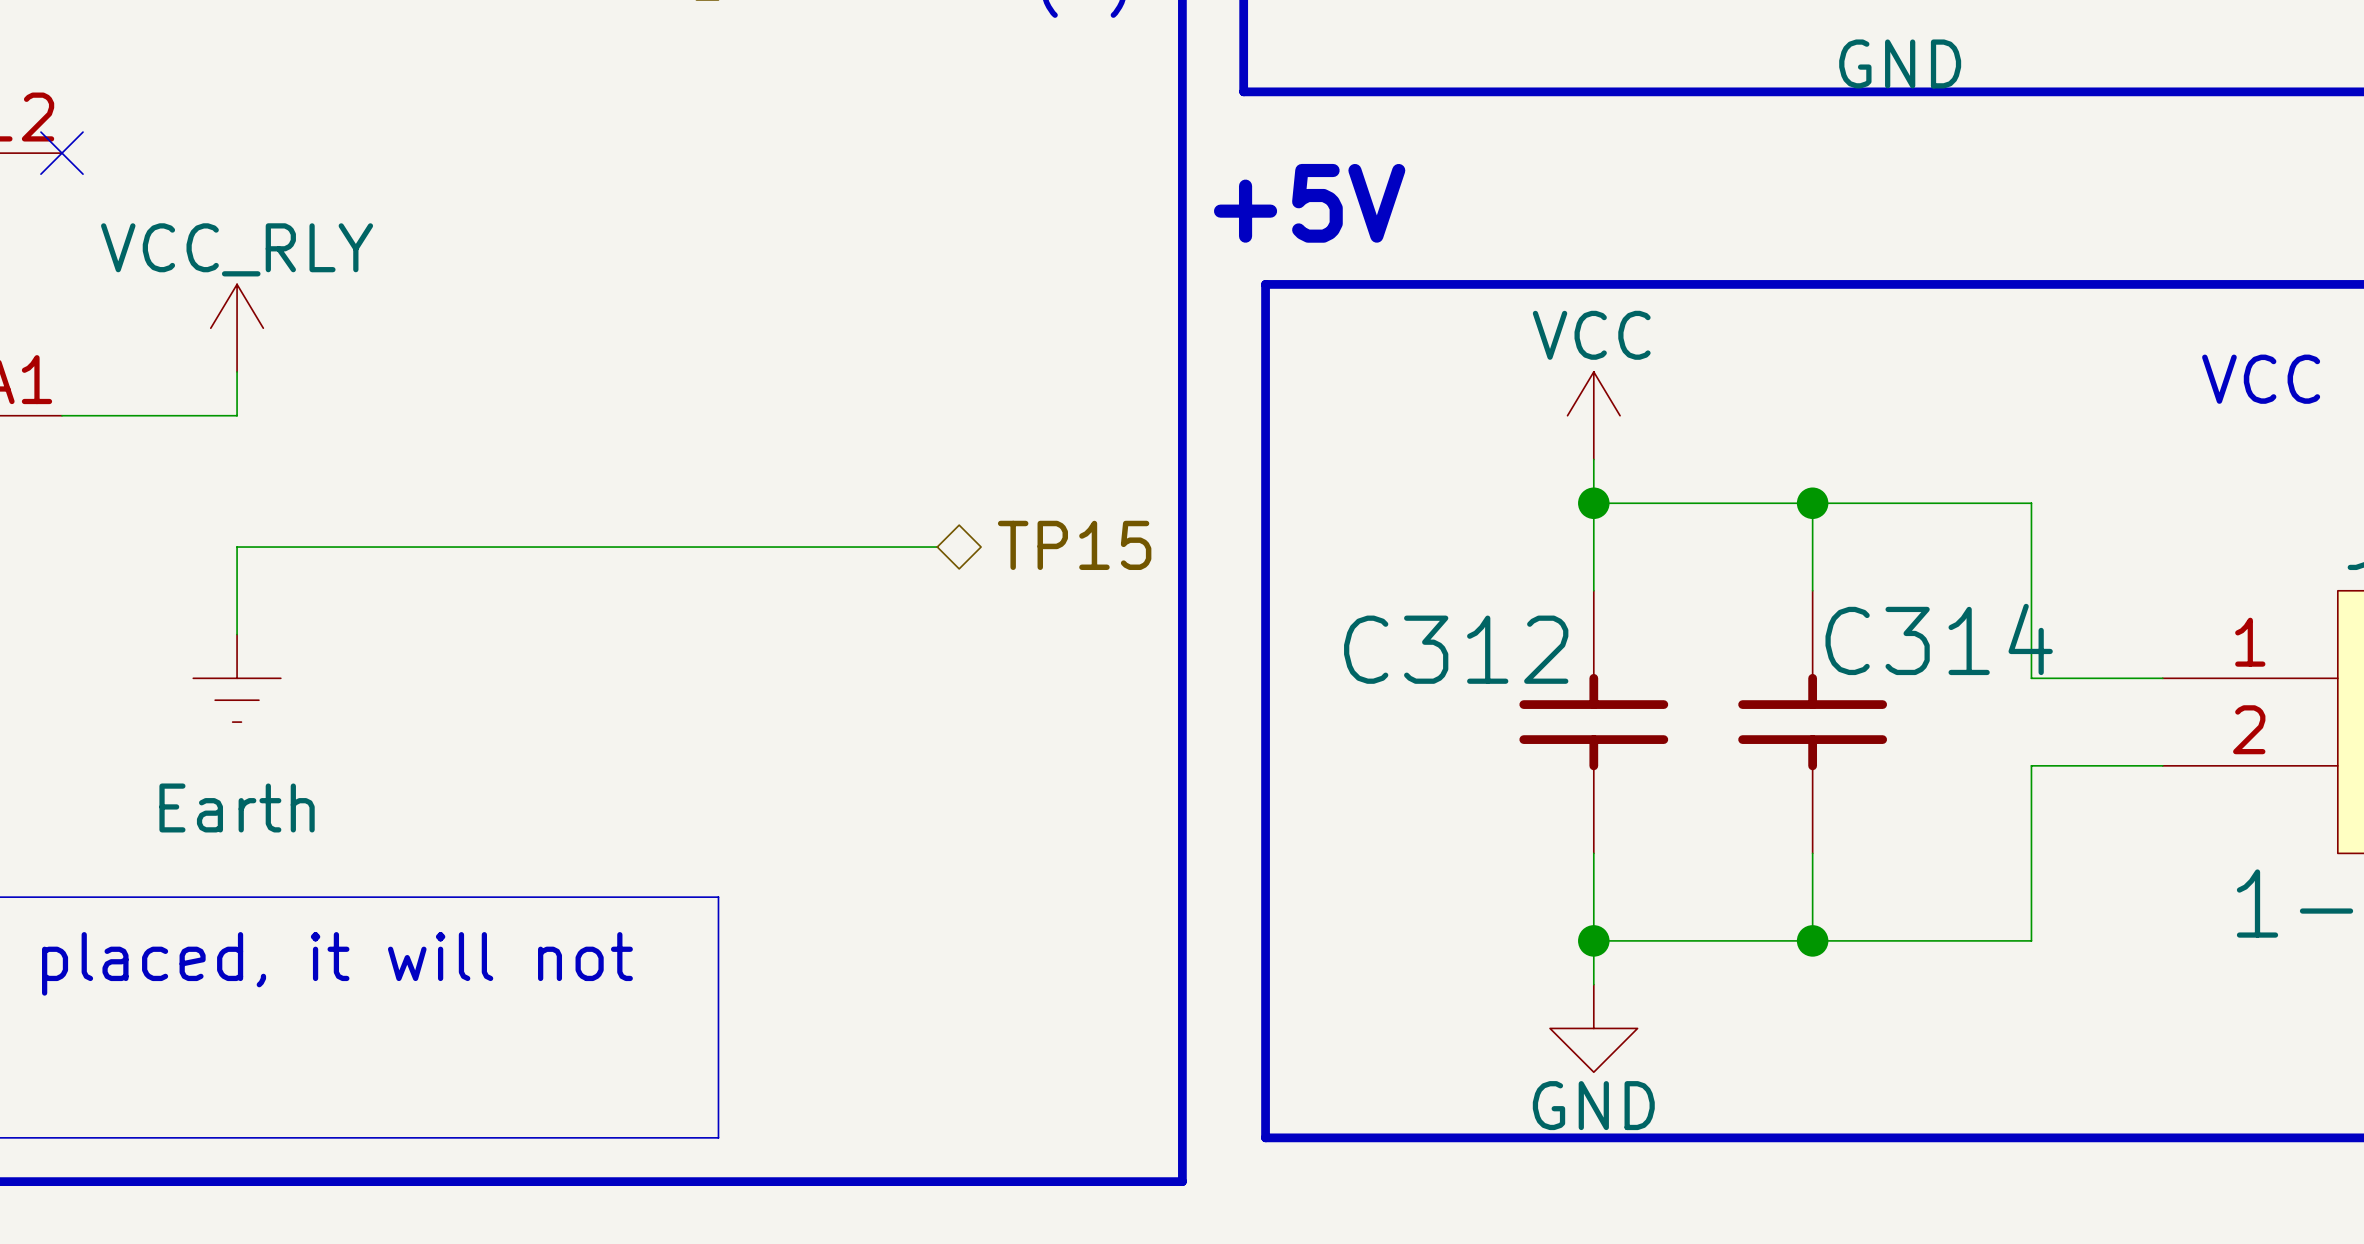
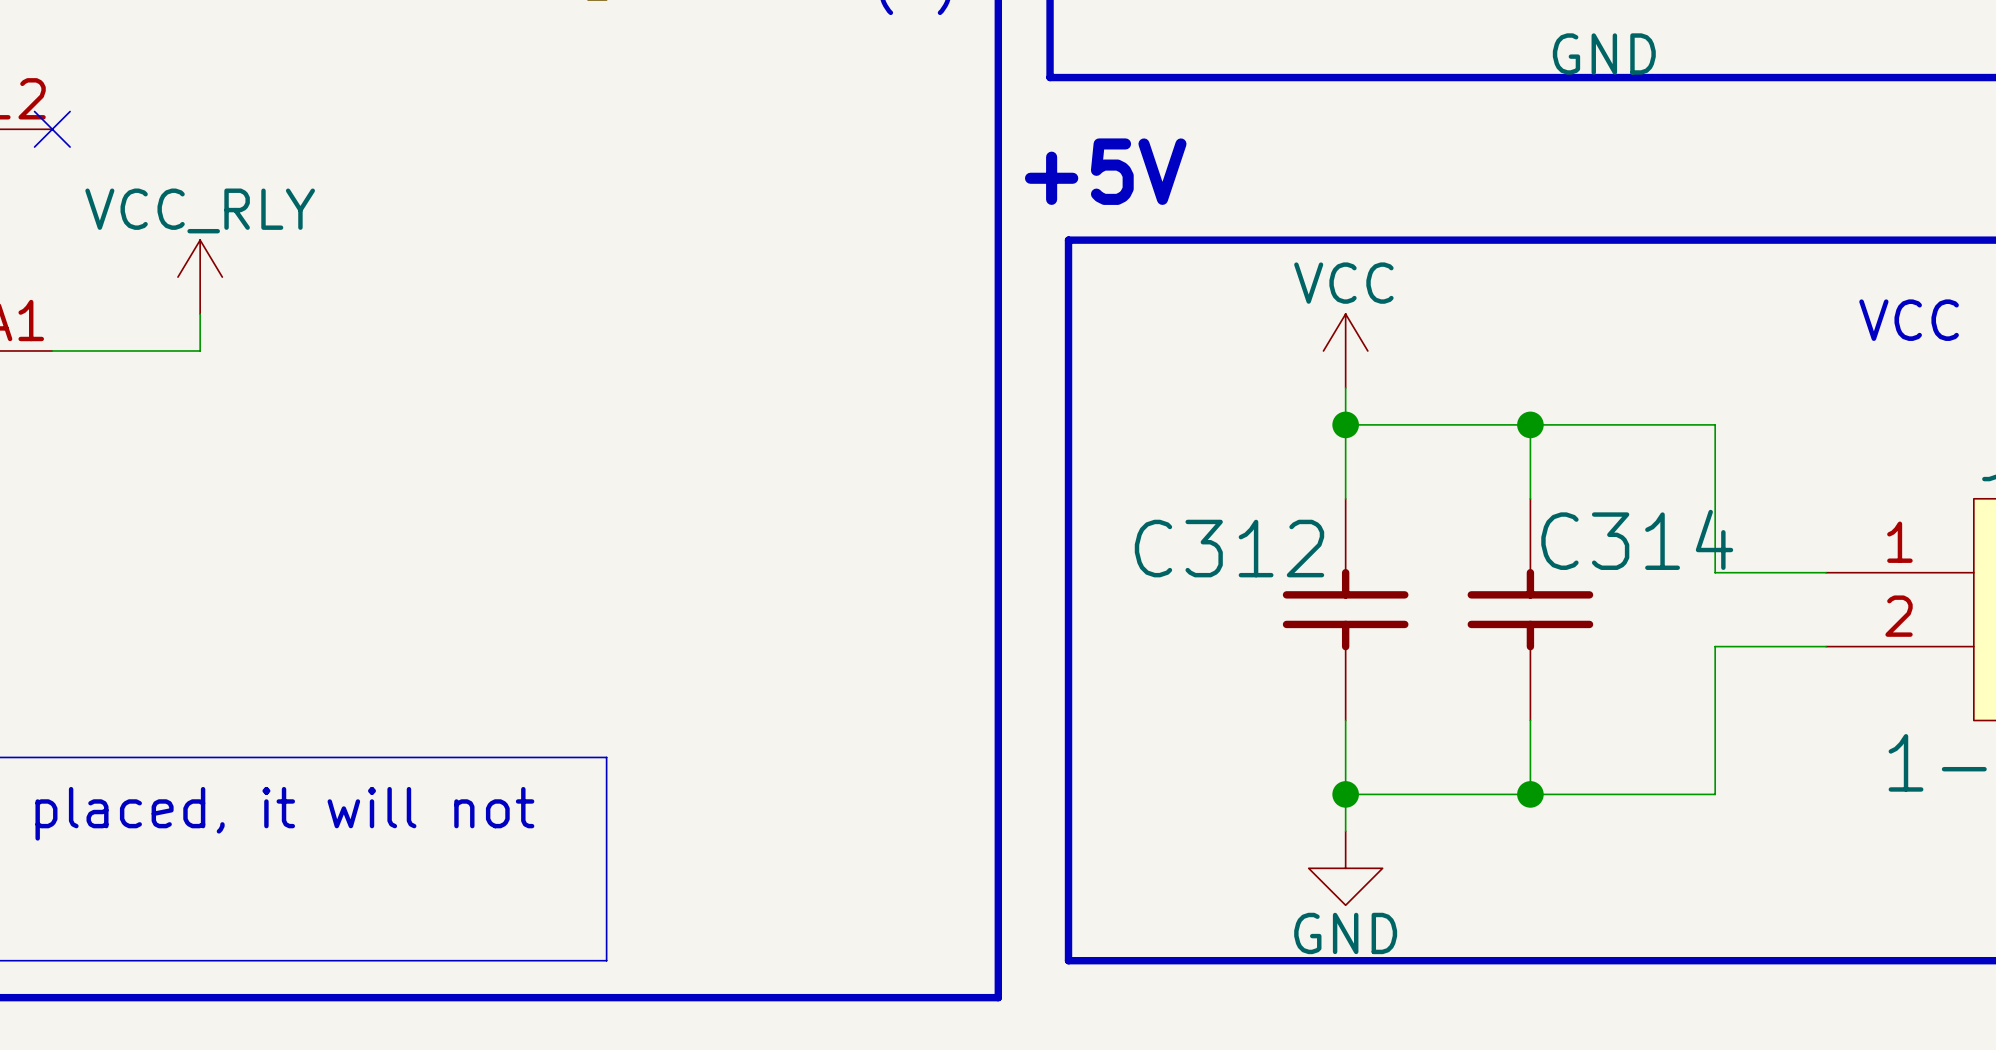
hierarchical label: TP15 (1074, 545) -> none
wire: (937, 547) (237, 547) (237, 634) -> none
power symbol: Earth (237, 678) -> none

